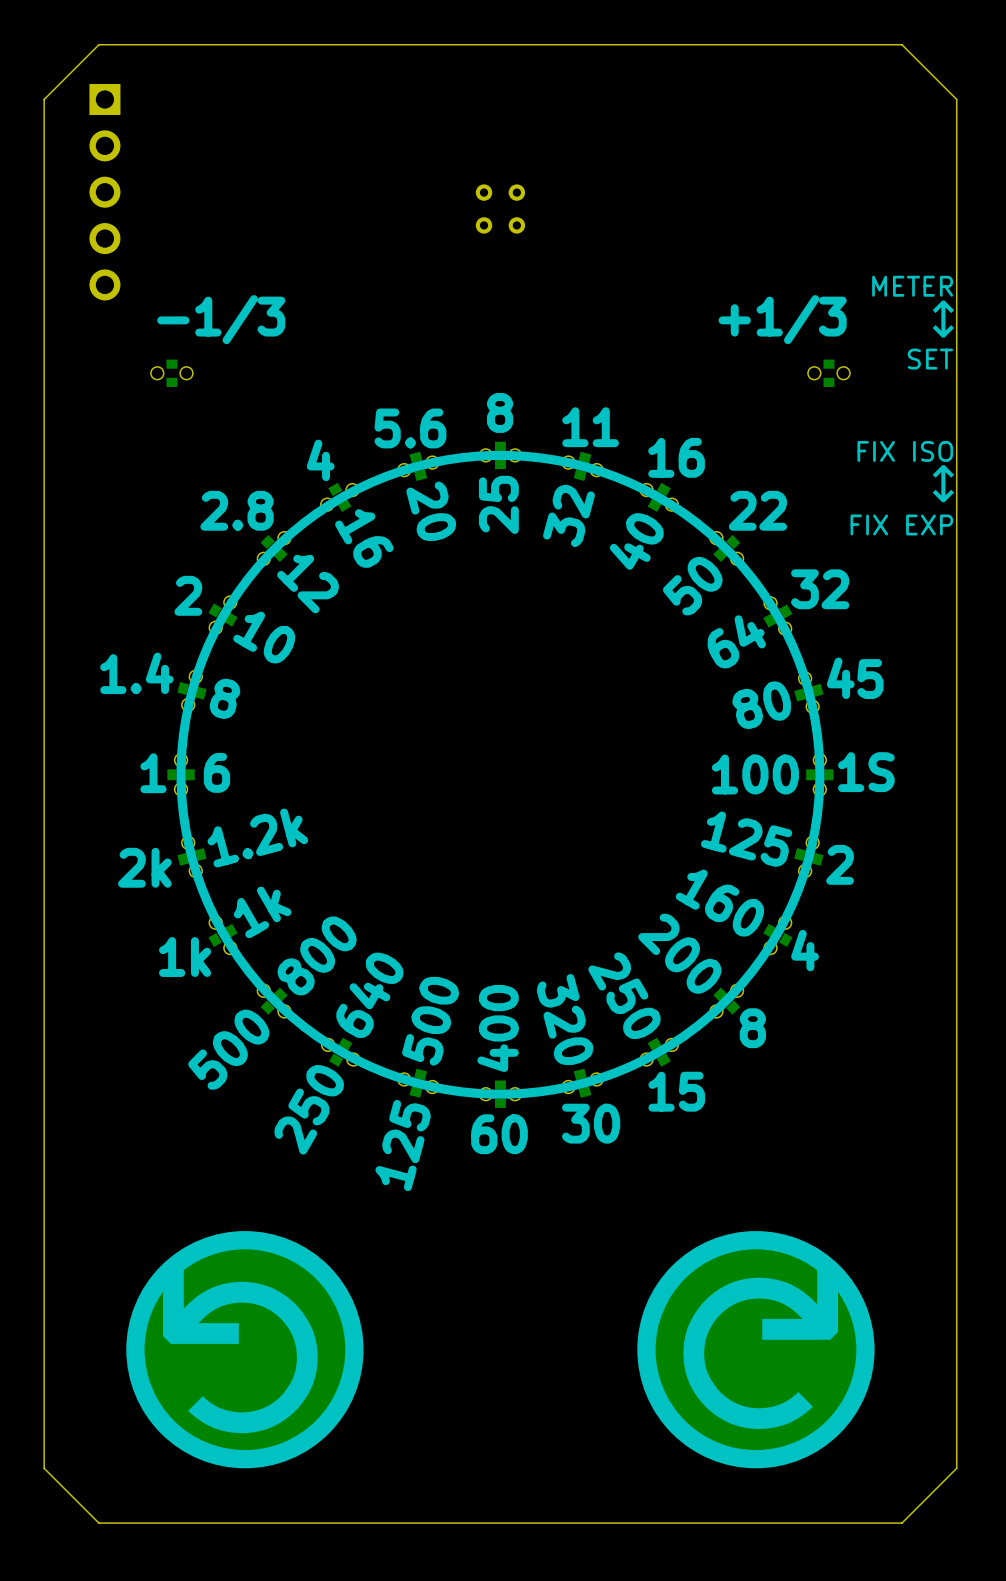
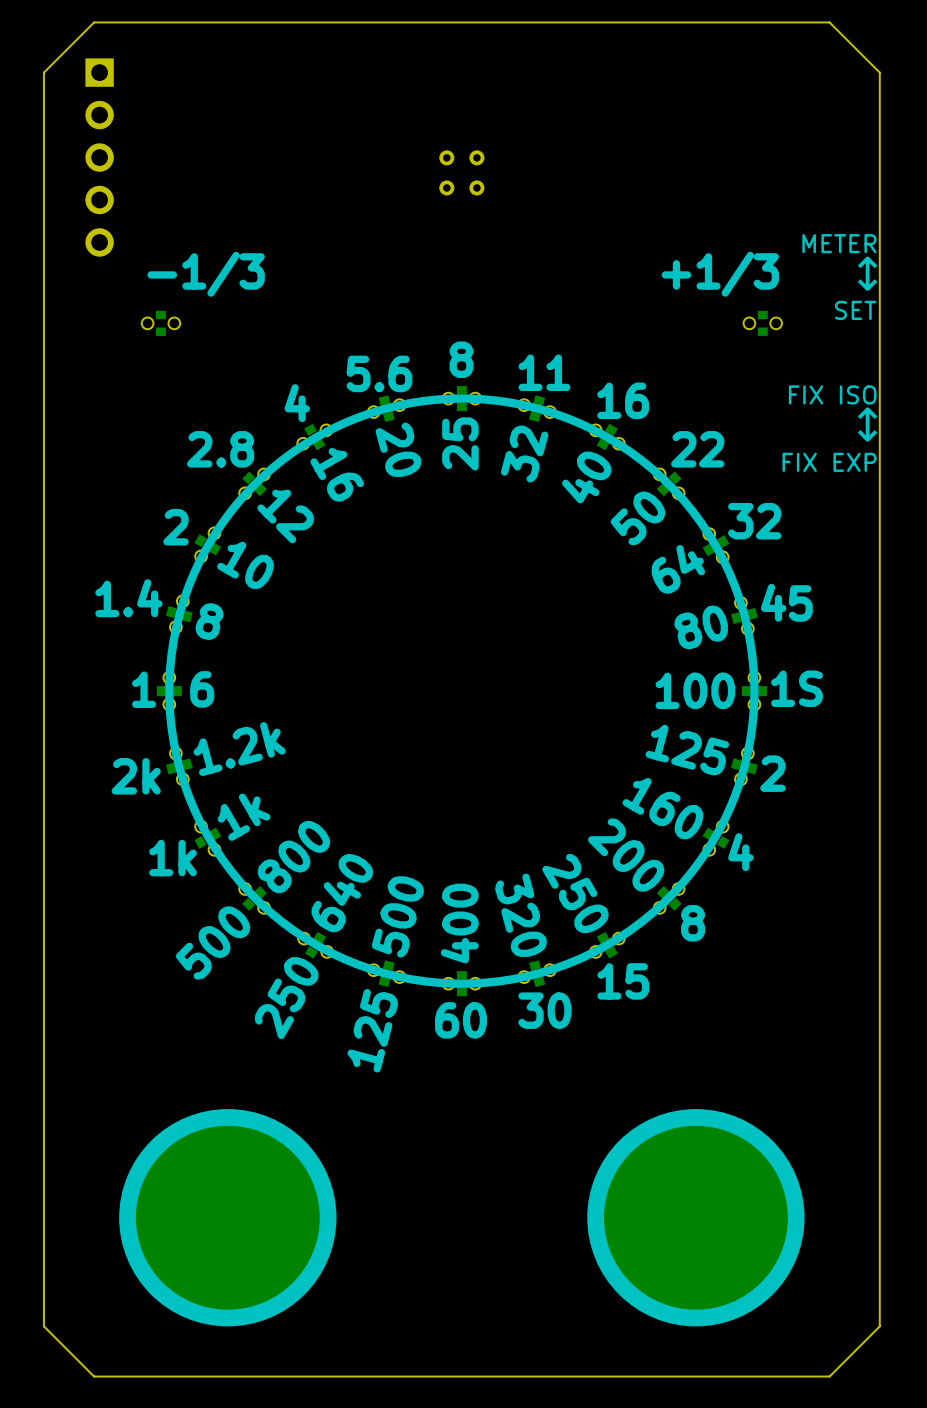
text: ↻ (760, 1346) -> none
text: ↺ (240, 1350) -> none

